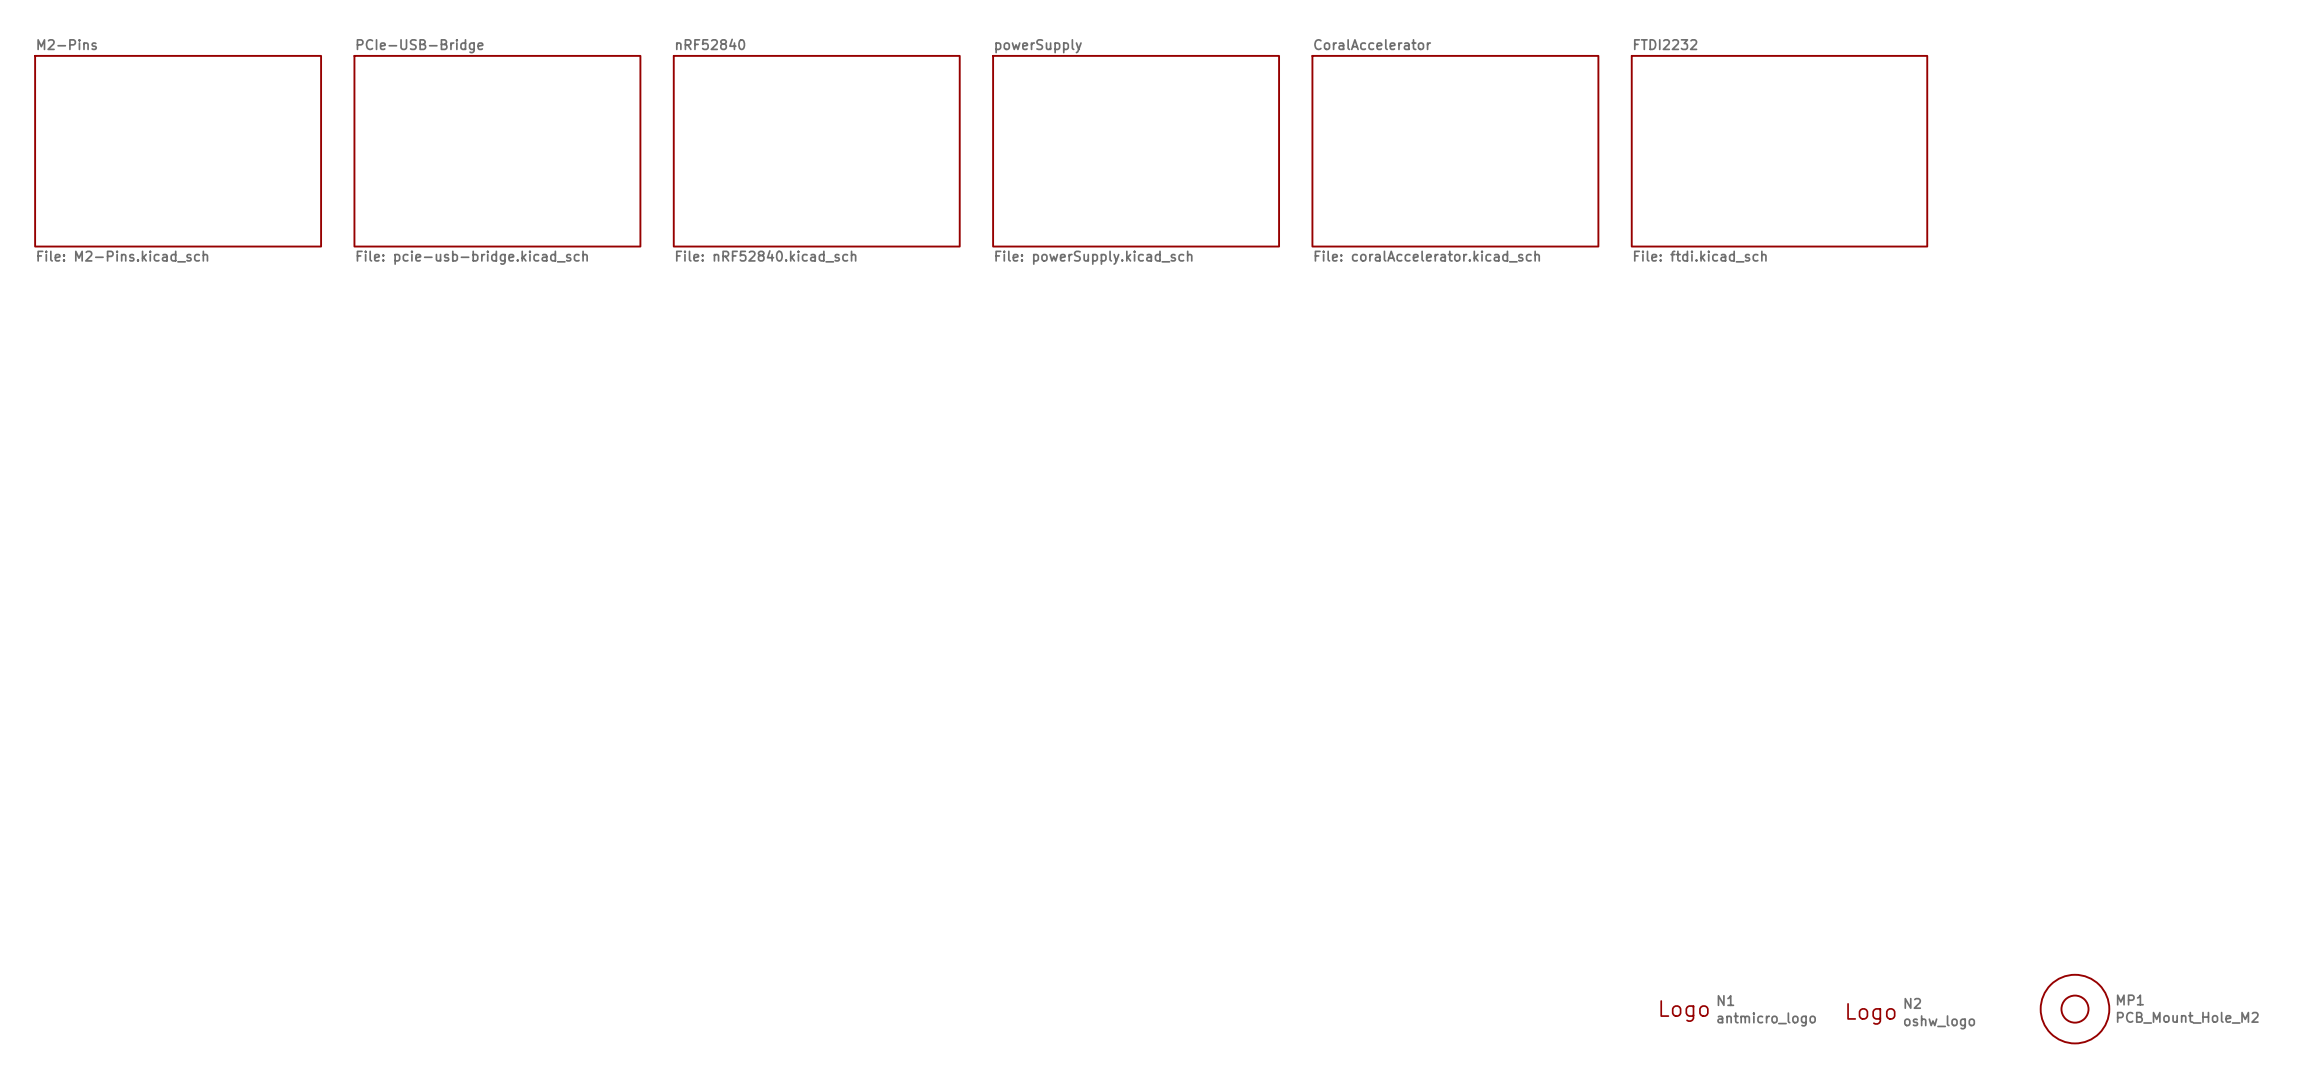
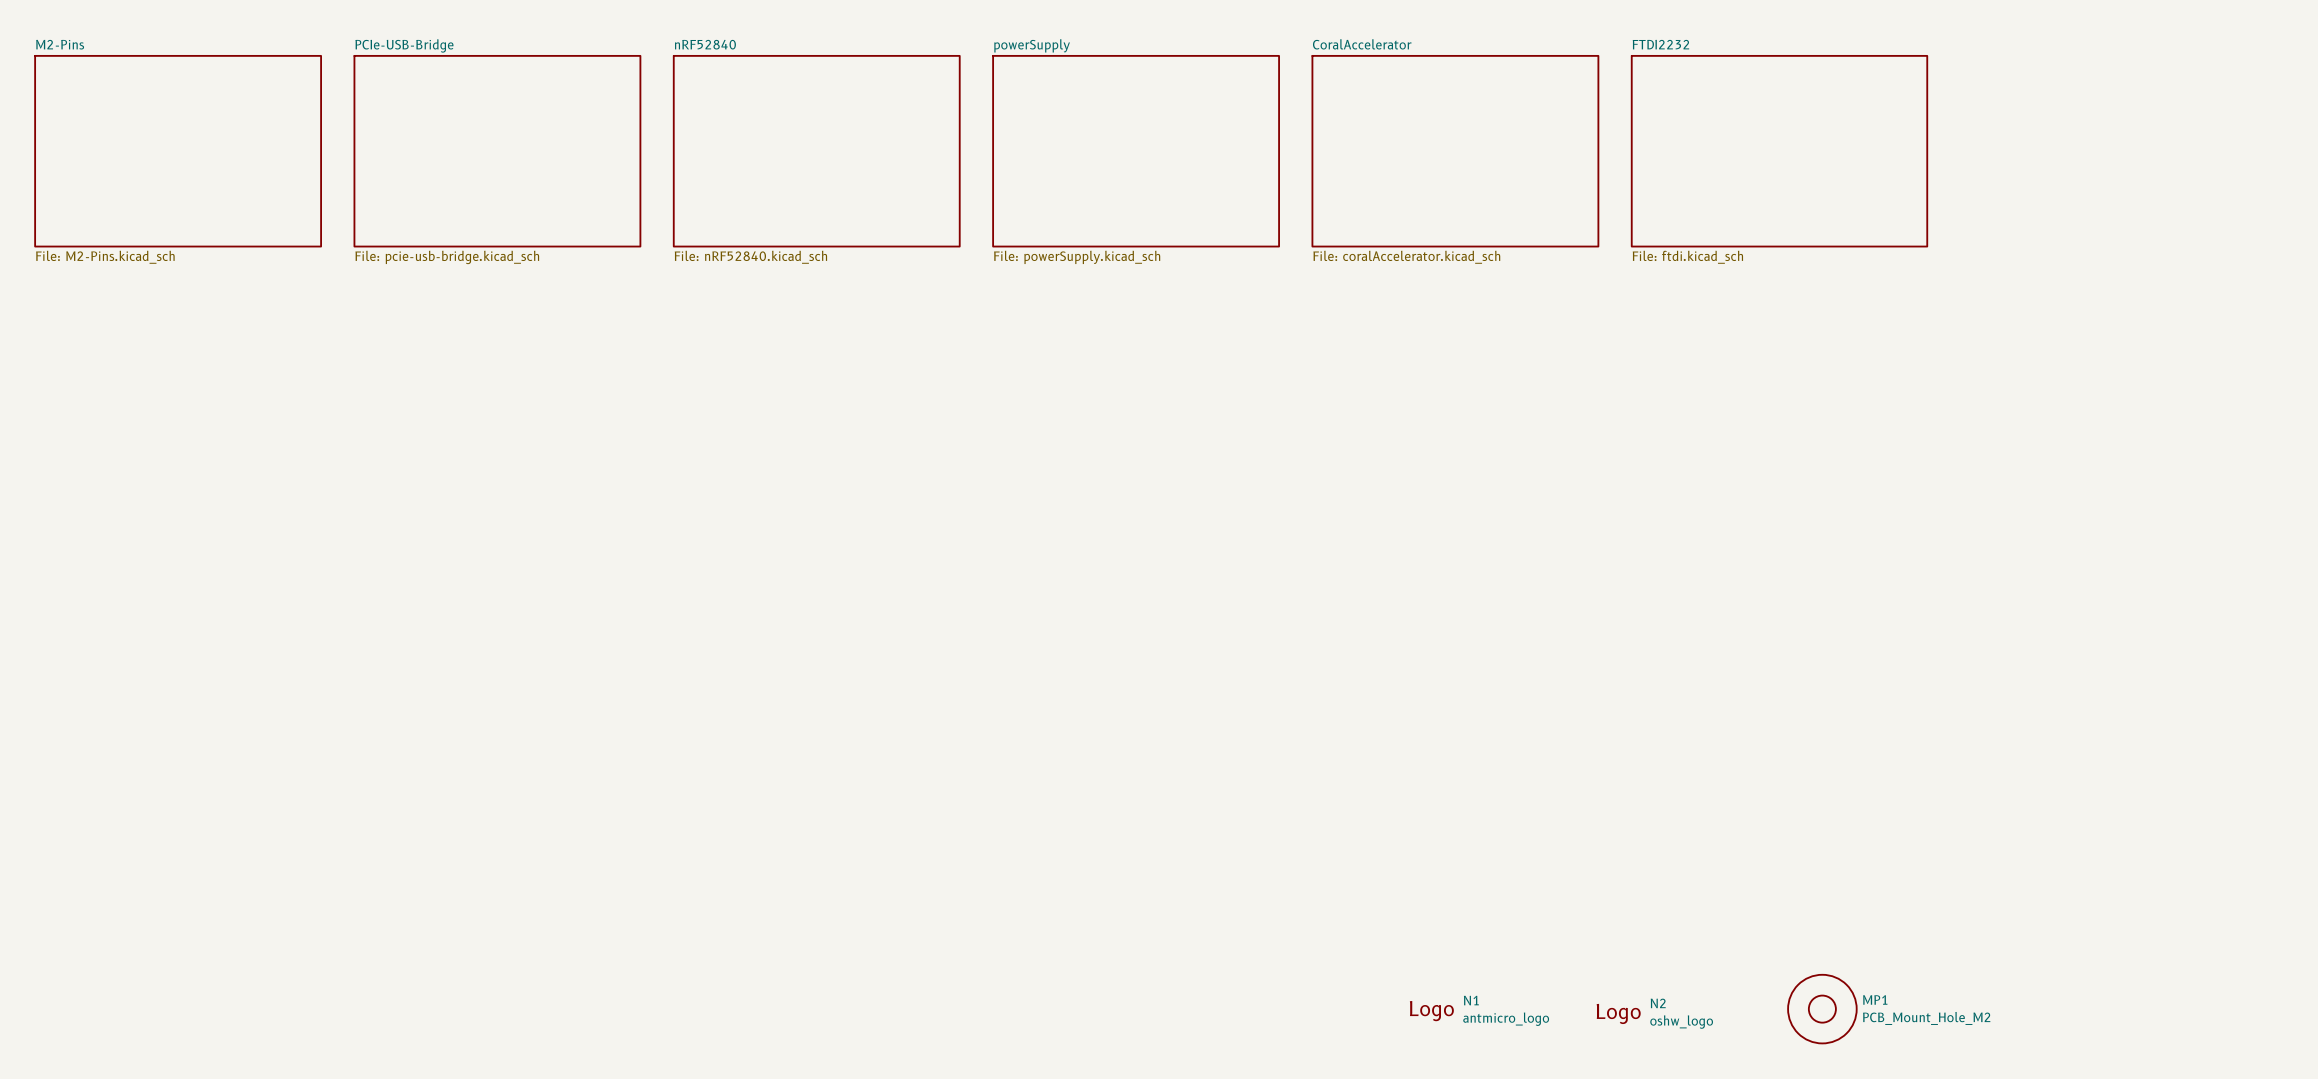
MP1 position: (2074, 1009) -> (1822, 1009)
N1 position: (1738, 1010) -> (1479, 1010)
N2 position: (1911, 1013) -> (1654, 1013)

